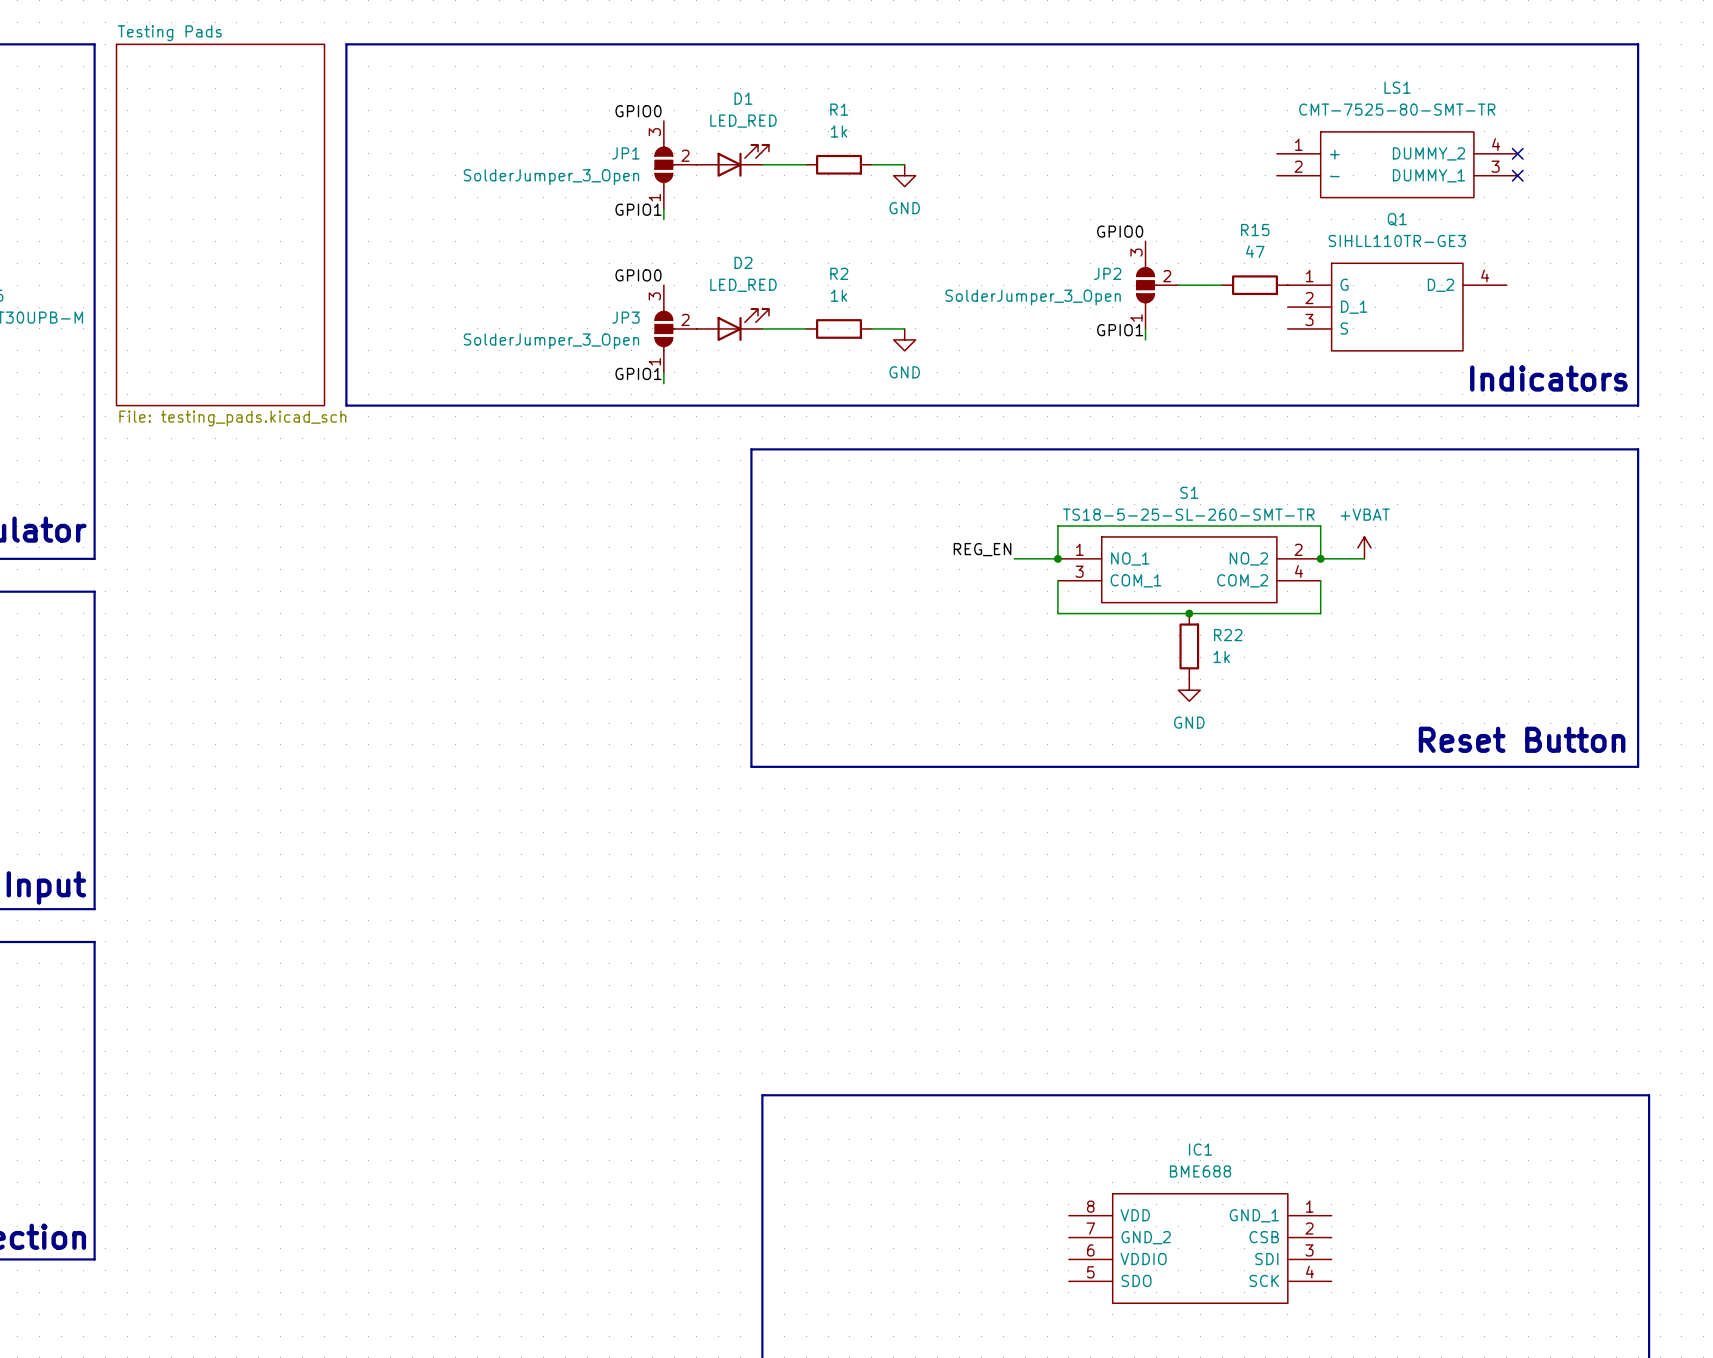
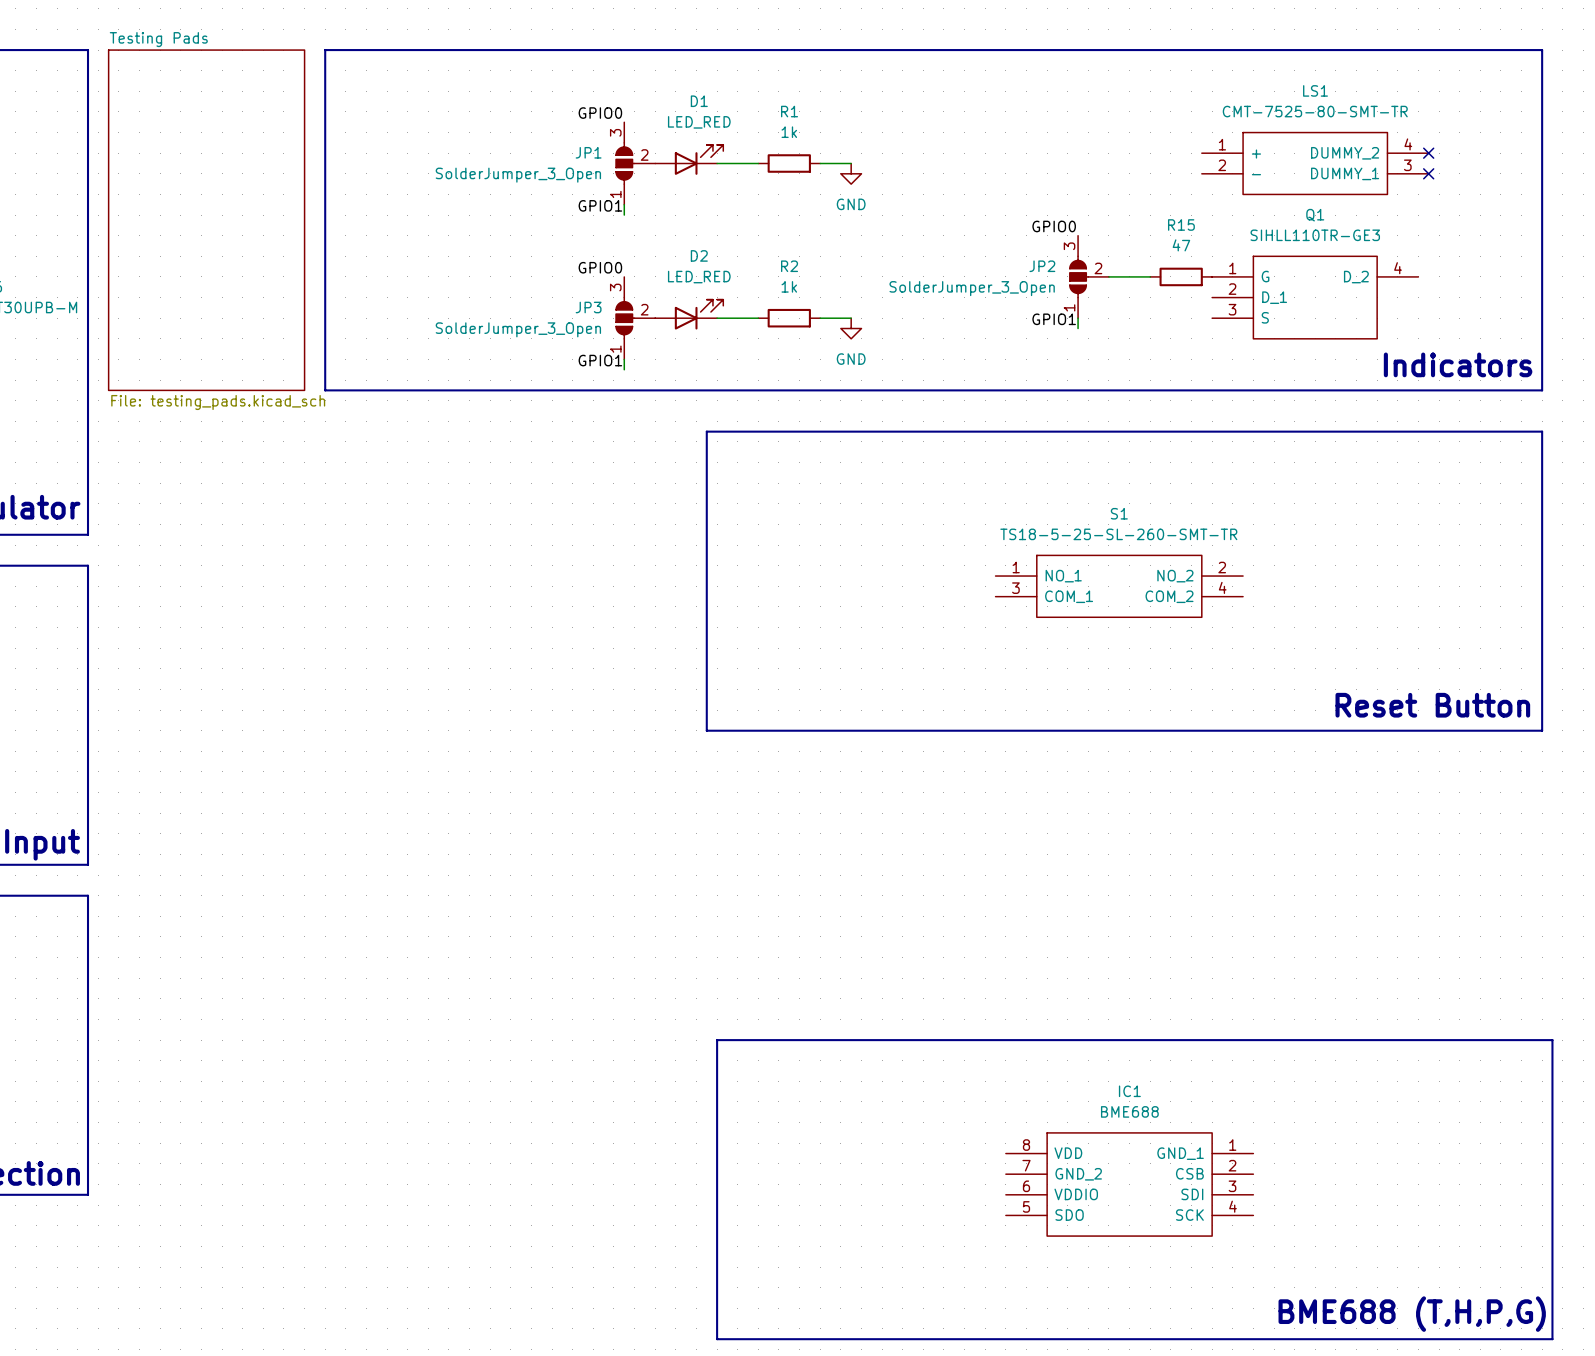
power symbol: +VBAT (1364, 547) -> none
label: REG_EN (982, 549) -> none
wire: (1014, 558) (1057, 558) (1057, 526) (1320, 526) (1320, 558) (1364, 558) -> none
junction: (1057, 558) -> none
junction: (1320, 558) -> none
S1 position: (1189, 569) -> (1119, 586)
wire: (1057, 580) (1057, 613) (1320, 613) (1320, 580) -> none
junction: (1189, 613) -> none
R22: 1k (1189, 646) -> none
power symbol: GND (1189, 690) -> none

